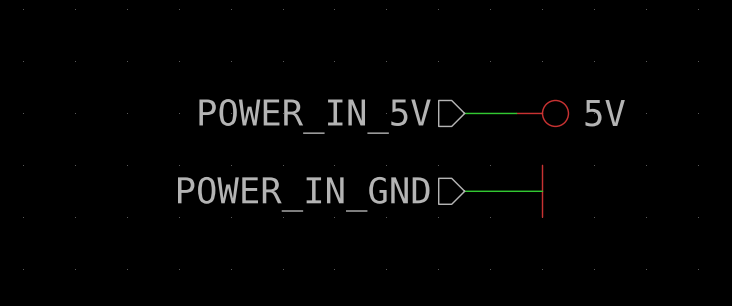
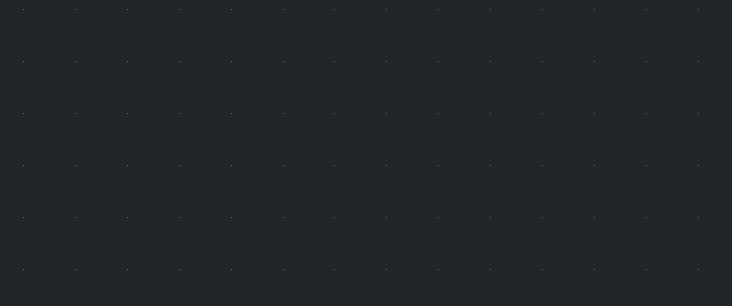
wire: (464, 113) (516, 113) -> none
power symbol: 5V (542, 113) -> none
hierarchical label: POWER_IN_5V (315, 116) -> none
wire: (464, 191) (542, 191) -> none
power symbol: (542, 191) -> none
hierarchical label: POWER_IN_GND (303, 194) -> none

